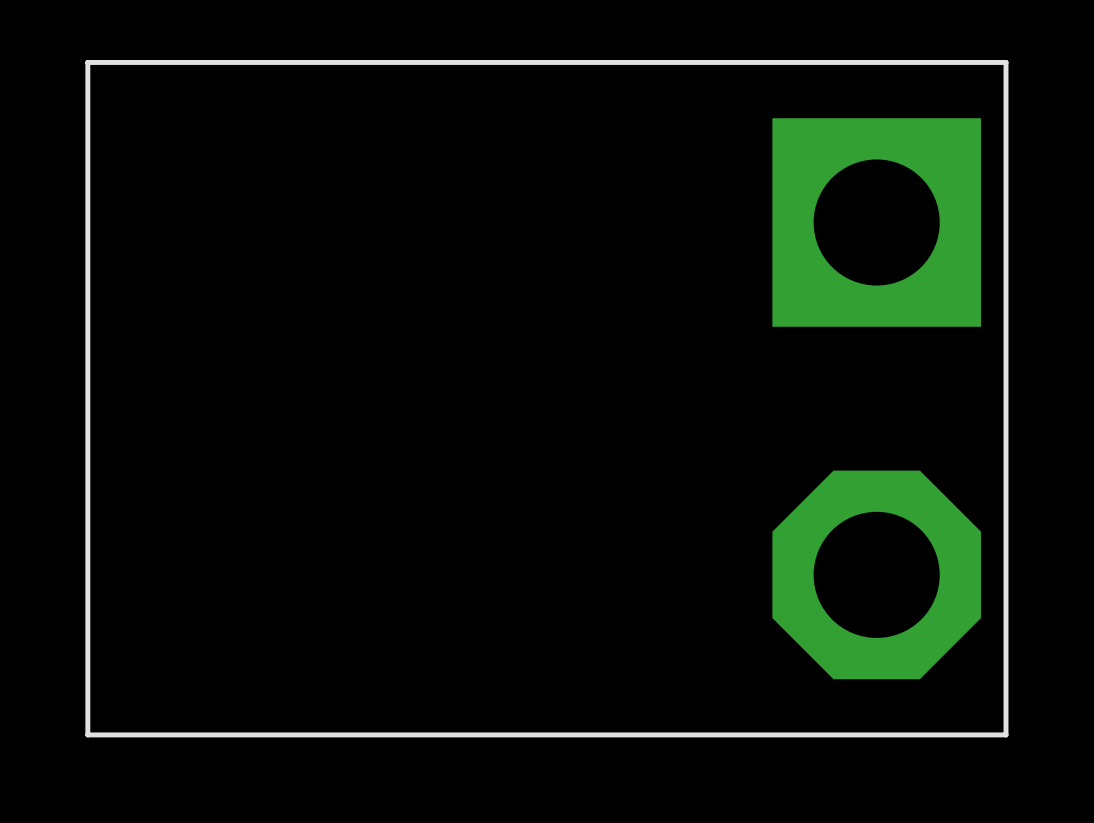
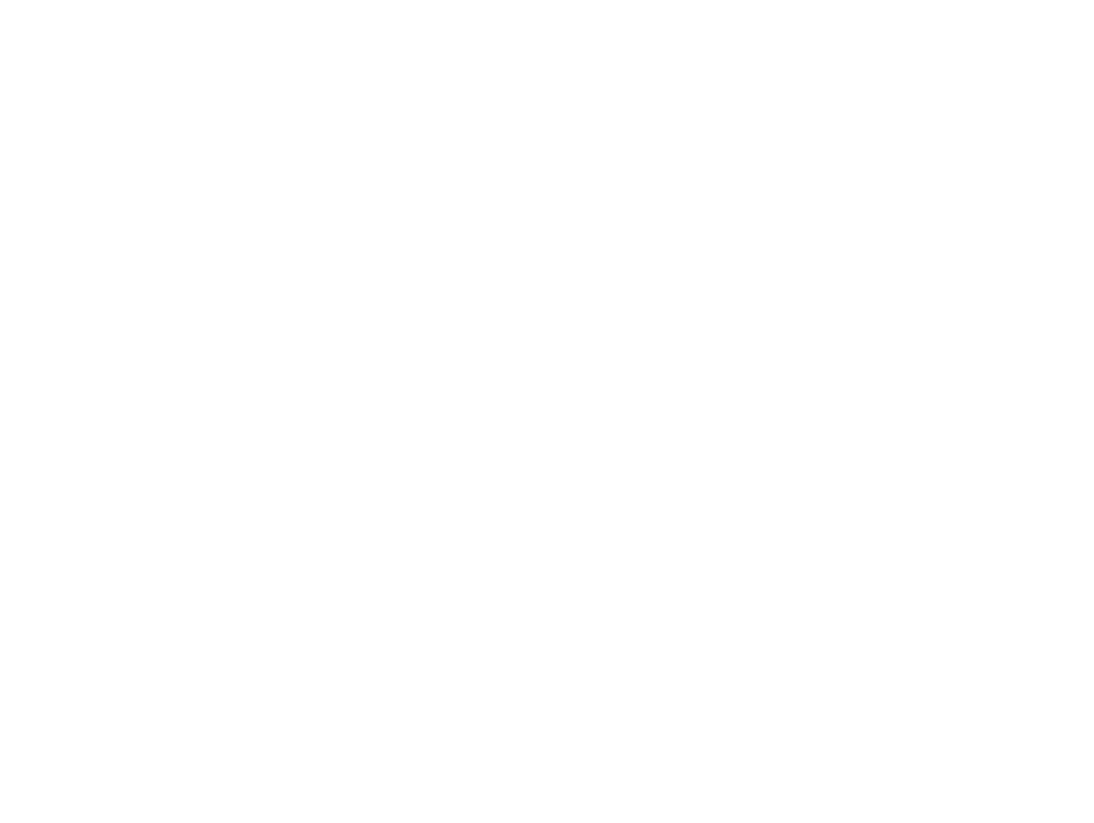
part: (546, 398) -> none

